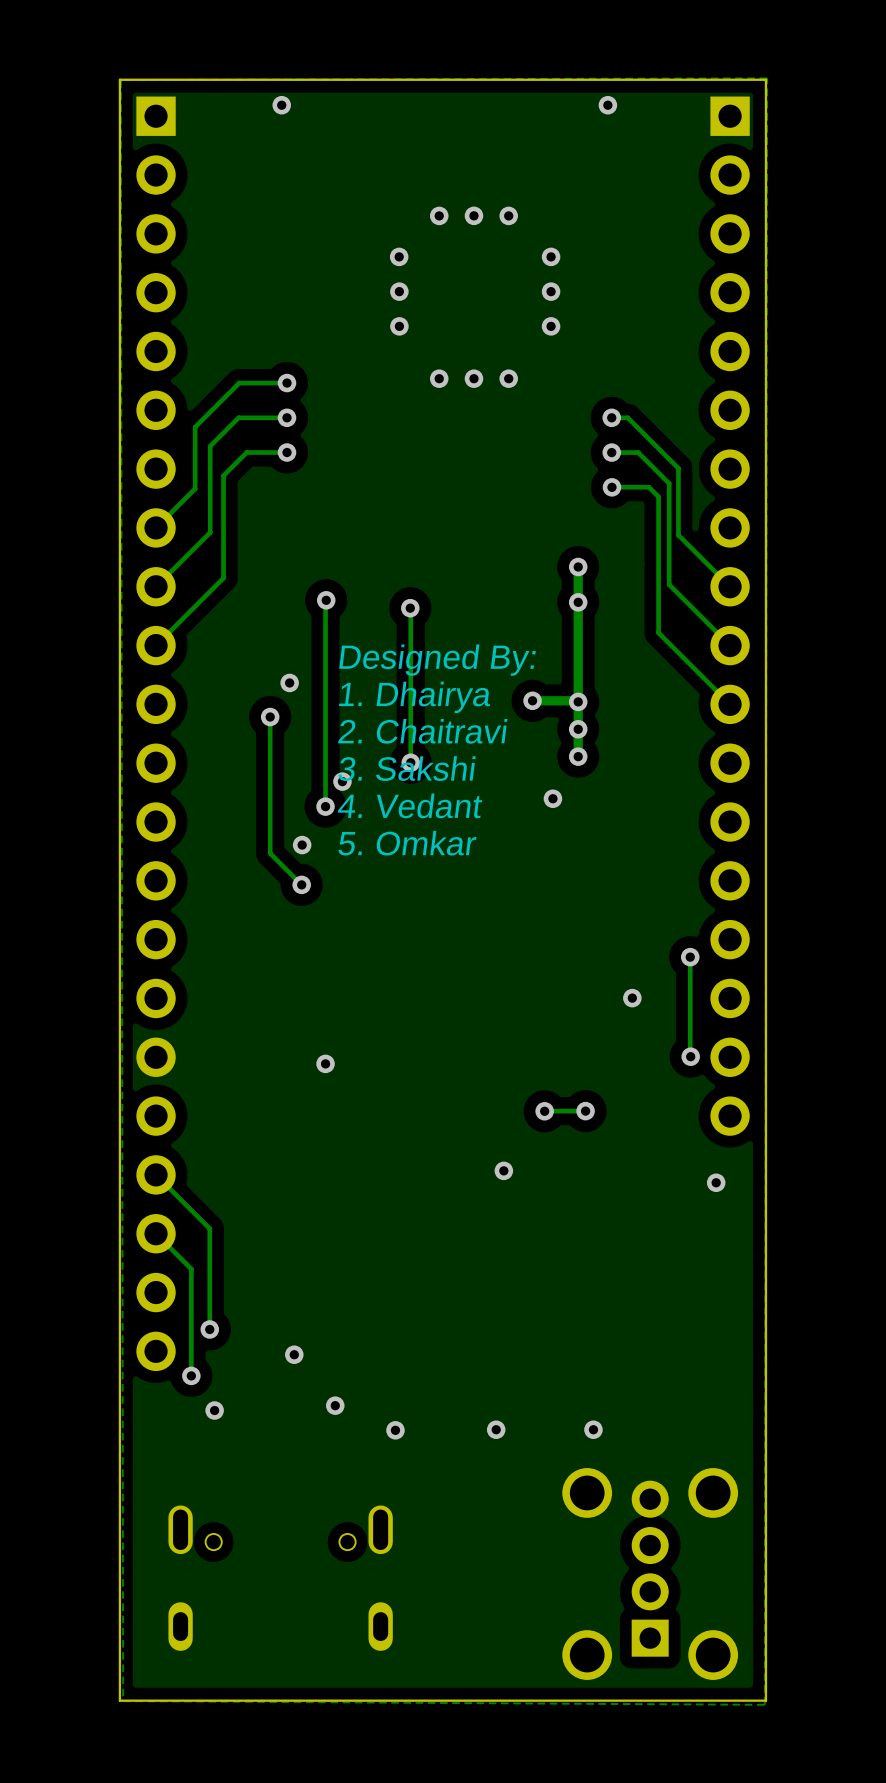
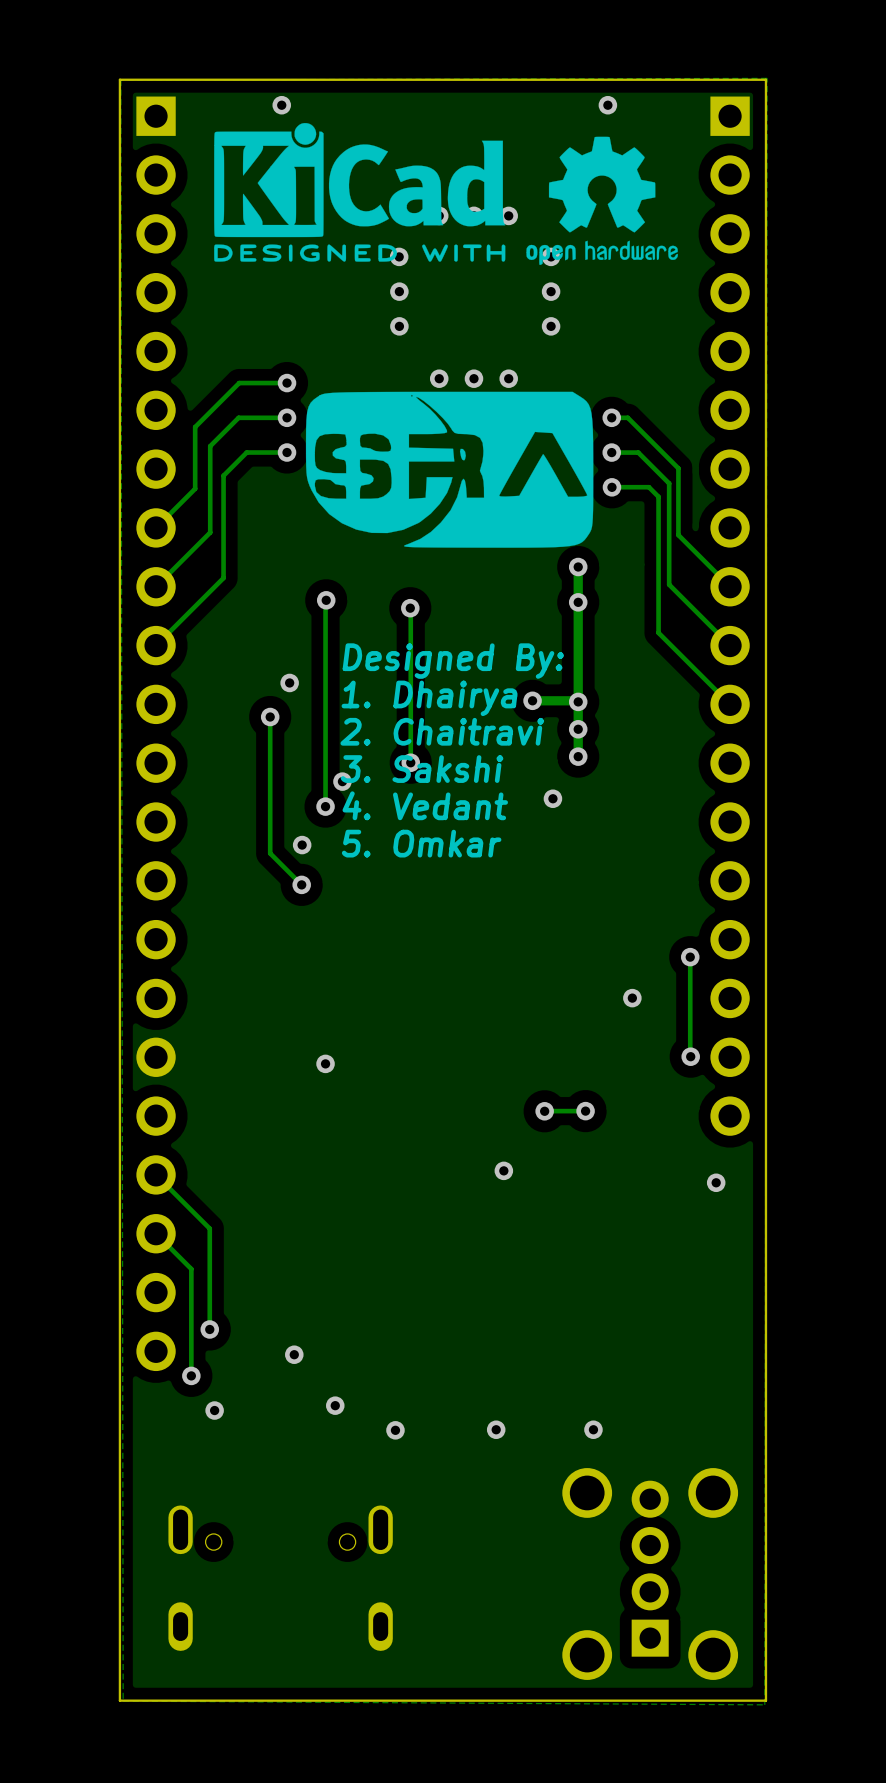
drawing: none -> [214, 123, 678, 266]
drawing: none -> [305, 391, 594, 548]

